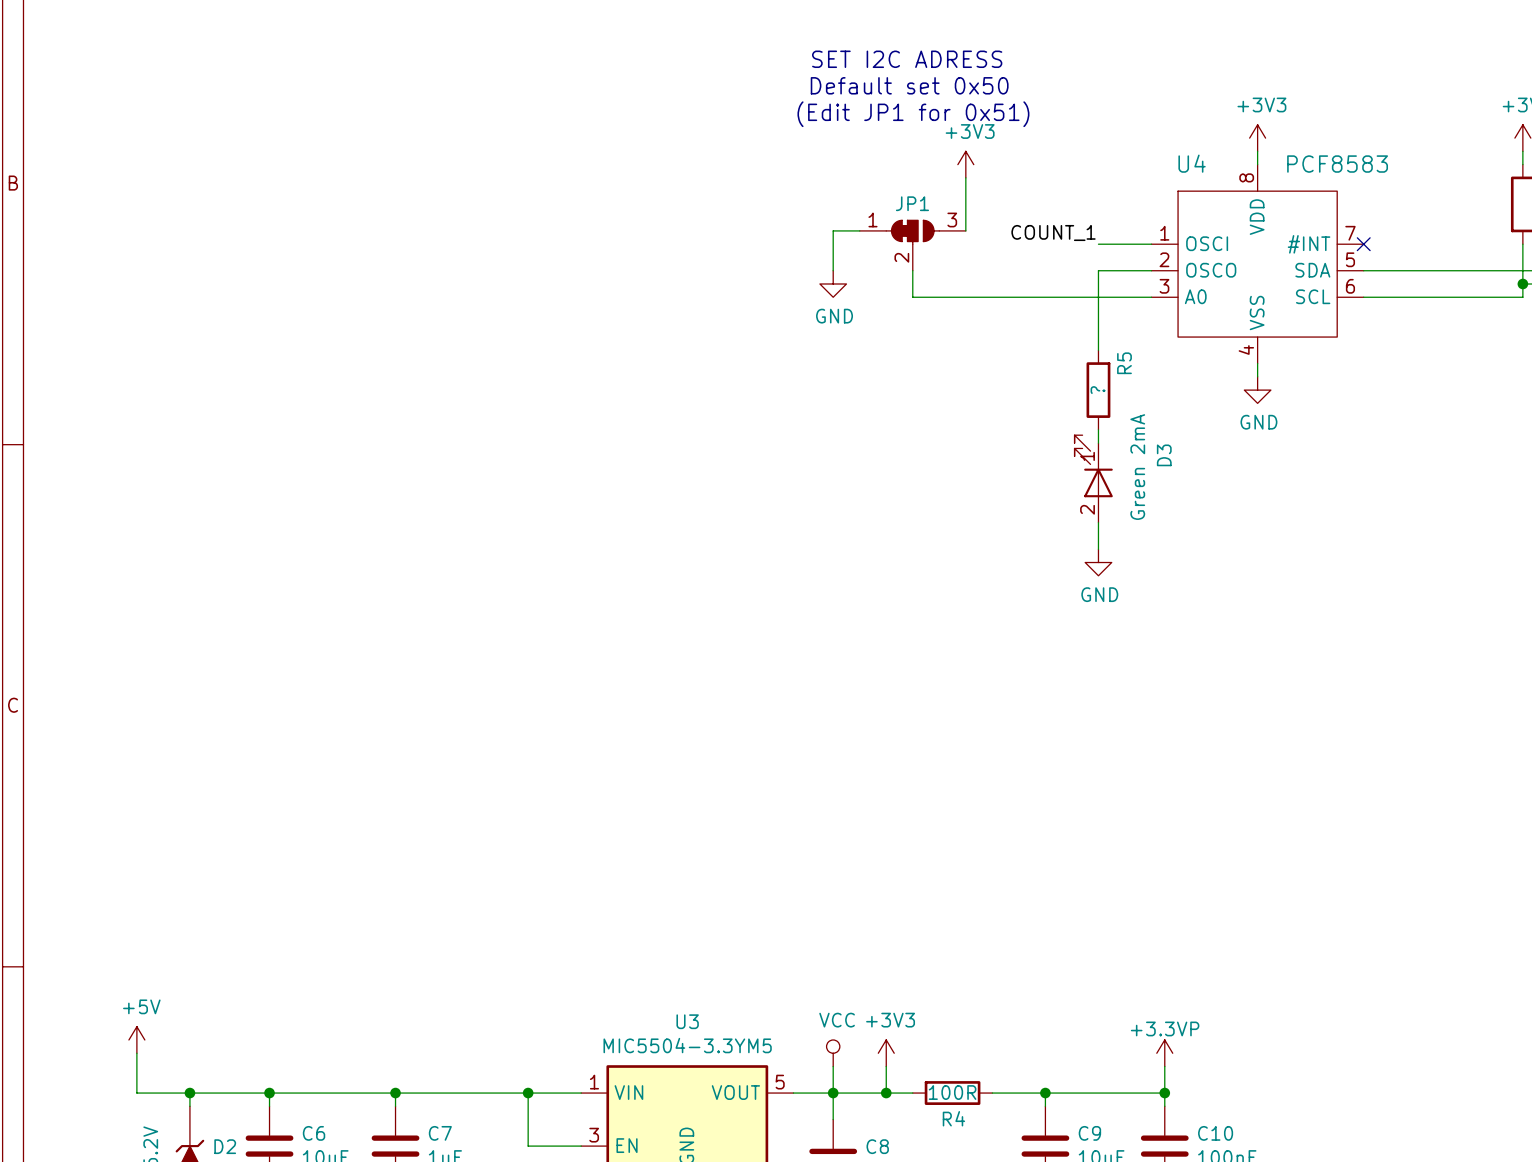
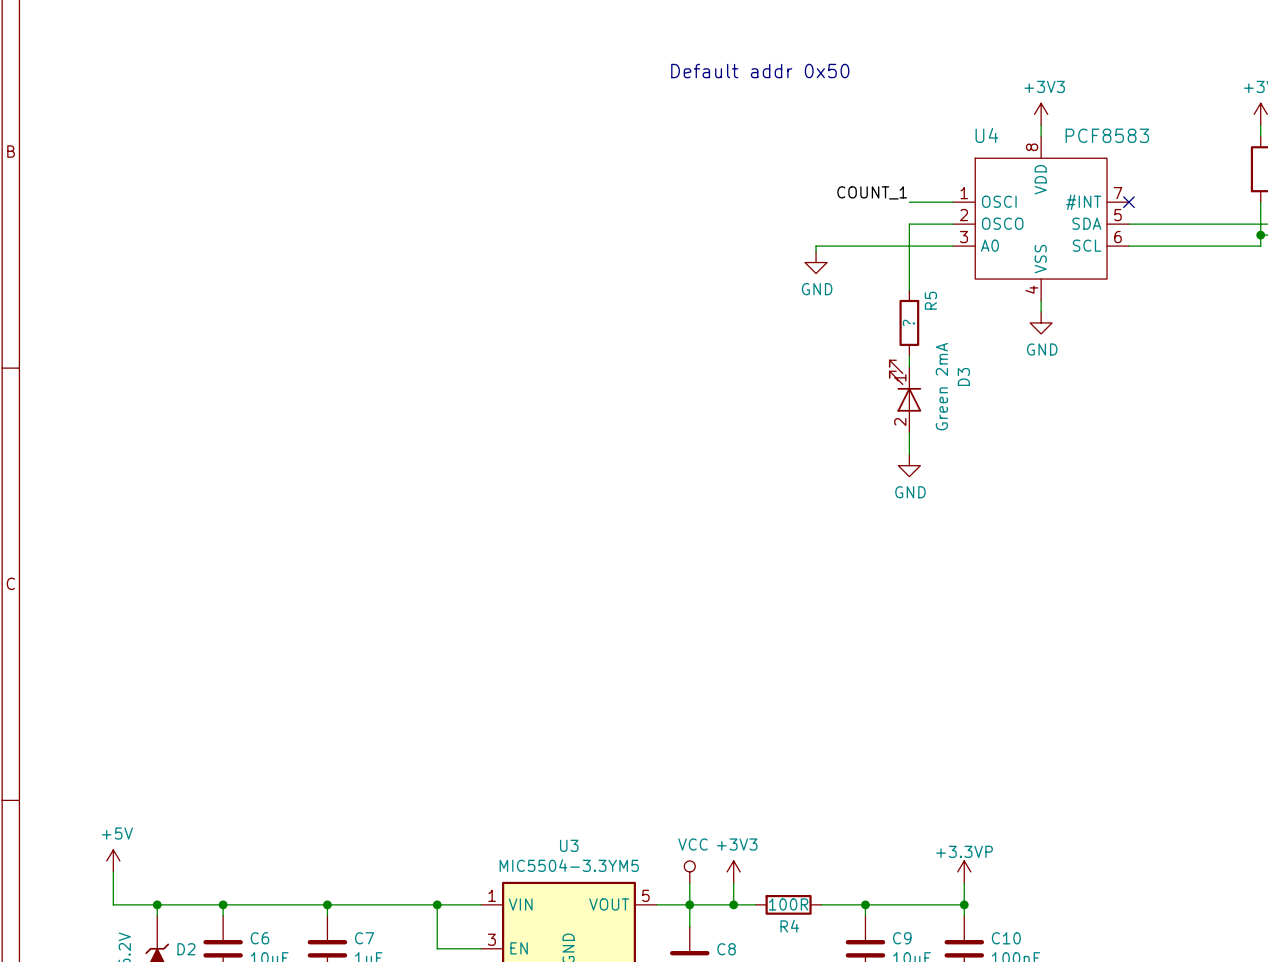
text: SET I2C ADRESS (907, 59) -> none
text: Default set 0x50 (909, 85) -> Default addr 0x50 (760, 71)
text: (Edit JP1 for 0x51) (913, 114) -> none
power symbol: +3V3 (965, 164) -> none
wire: (965, 177) (965, 230) -> none
wire: (859, 230) (833, 230) (833, 270) -> none
JP1: (912, 245) -> none
wire: (912, 270) (912, 297) (985, 297) -> (816, 251) (816, 246)
power symbol position: GND (833, 283) -> GND (816, 262)

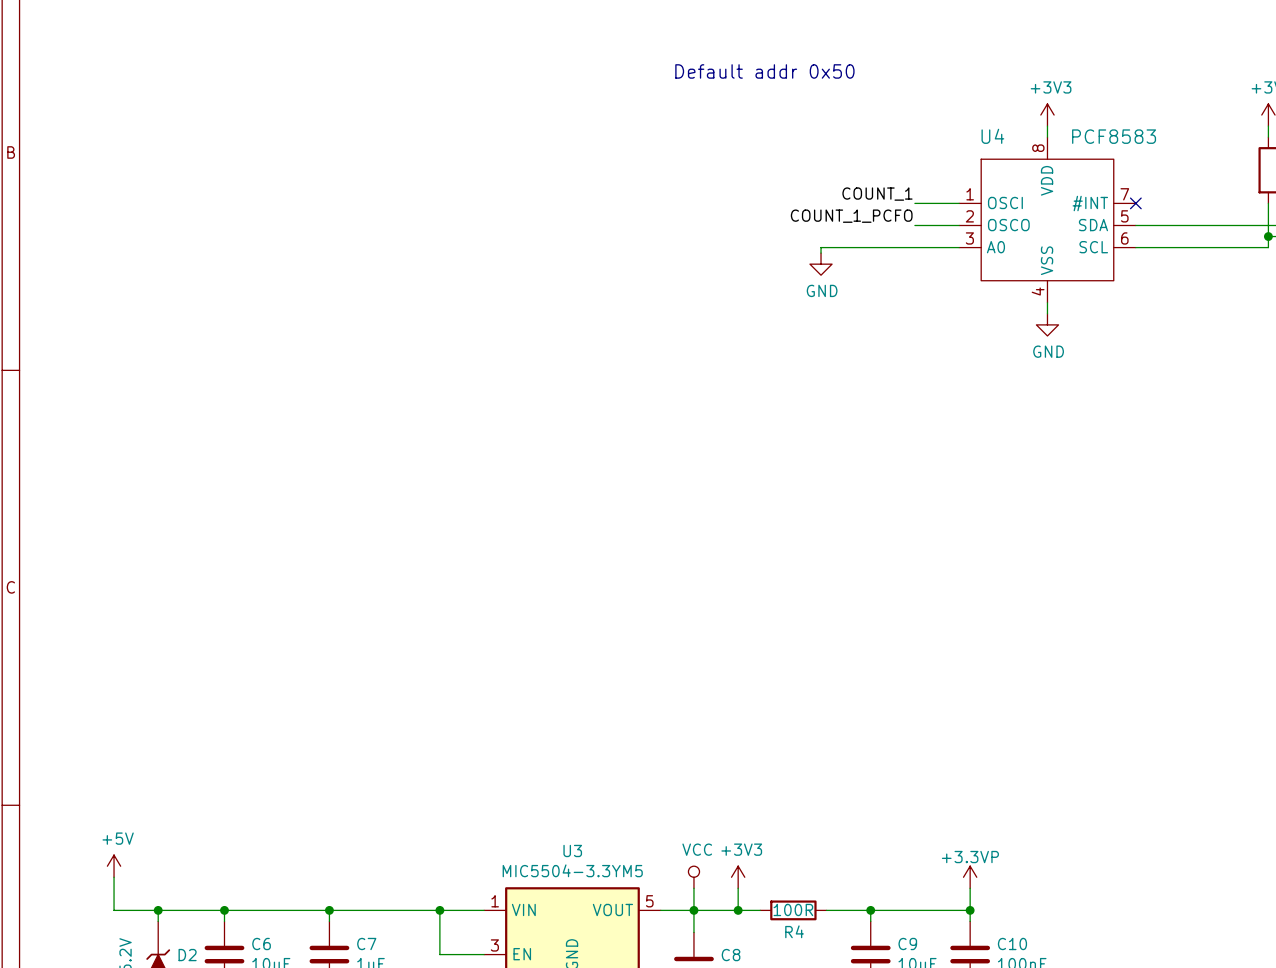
label: none -> COUNT_1_PCFO (851, 216)
wire: (909, 224) (909, 290) -> none
R5: ? (909, 322) -> none
wire: (909, 355) (909, 366) -> none
D3: Green 2mA (905, 396) -> none
wire: (909, 432) (909, 454) -> none
power symbol: GND (909, 465) -> none

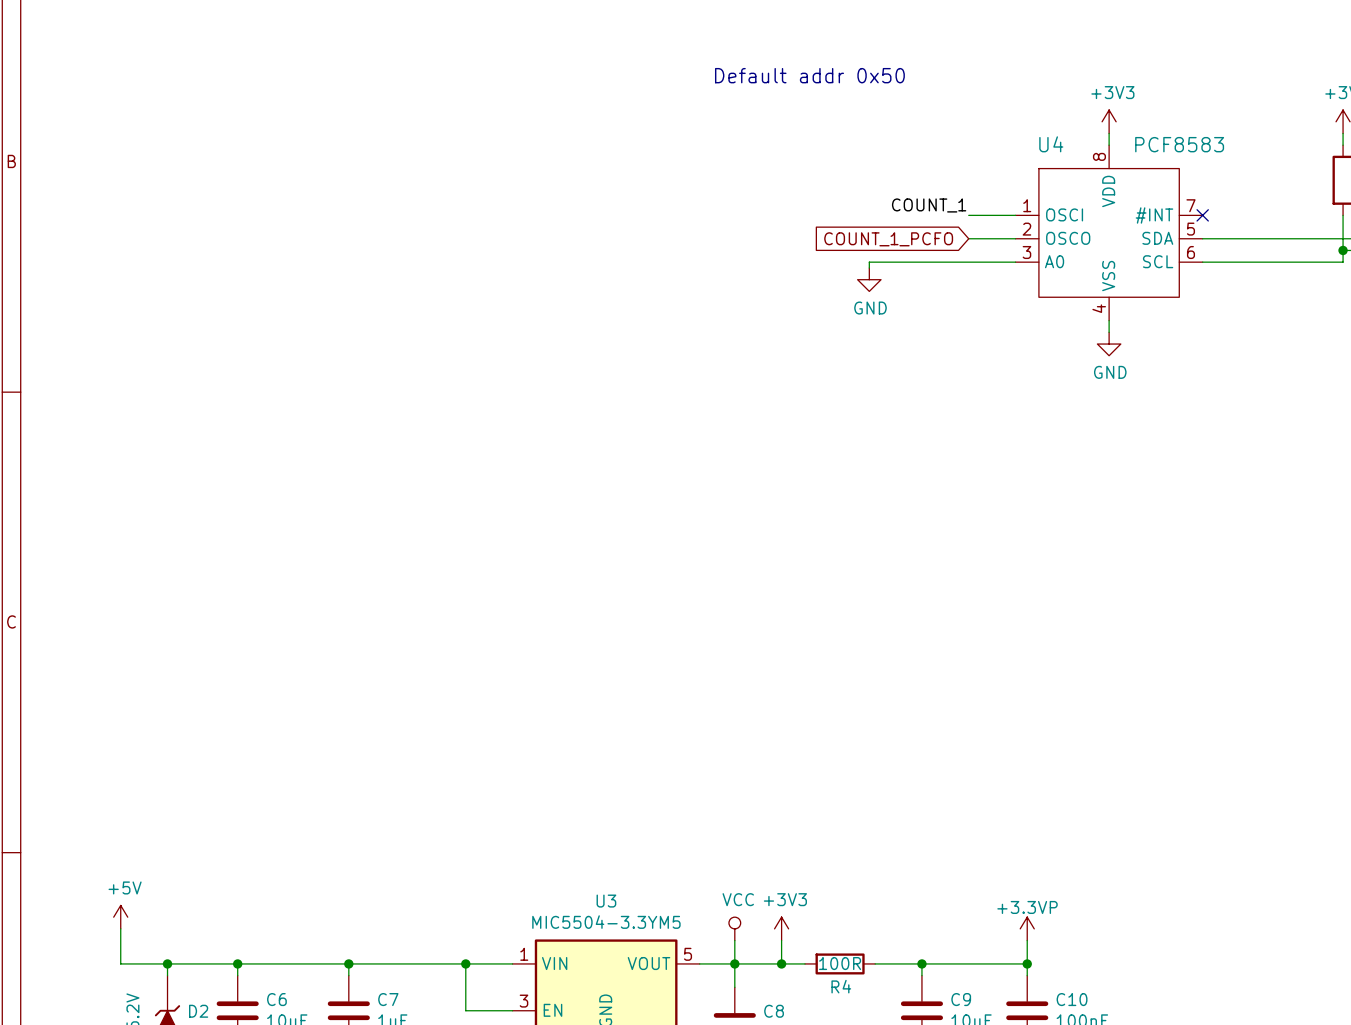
label: COUNT_1_PCFO (851, 216) -> none
global label: none -> COUNT_1_PCFO (888, 239)

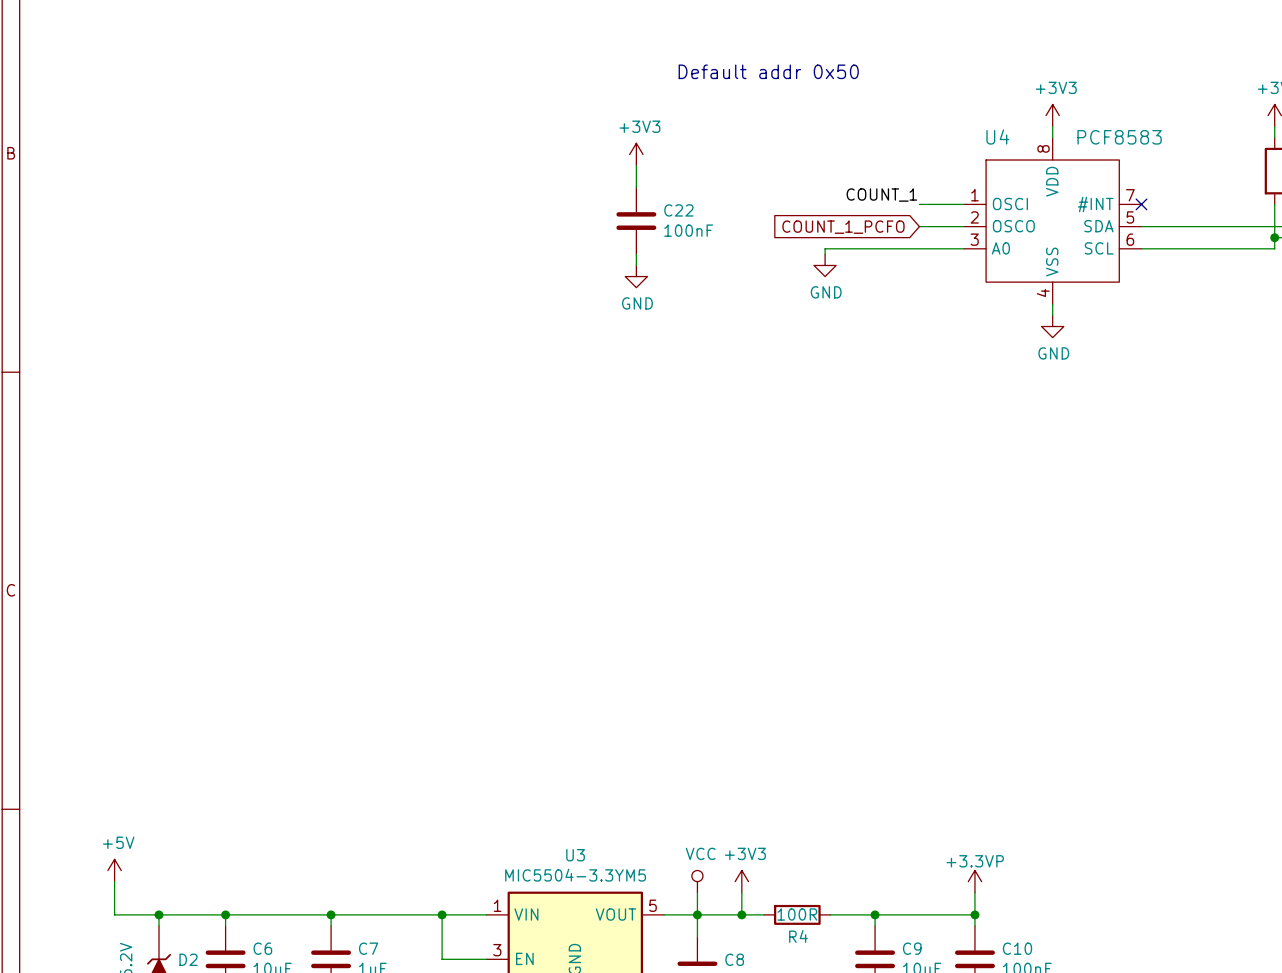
power symbol: none -> +3V3 (636, 154)
wire: none -> (636, 165) (636, 187)
C22: none -> 100nF (636, 221)
wire: none -> (636, 254) (636, 265)
power symbol: none -> GND (636, 276)

